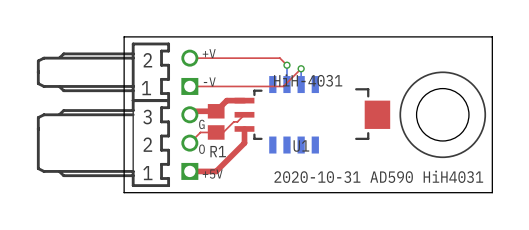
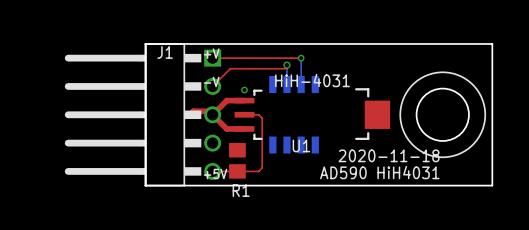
board edge: (492, 43) (492, 36) (124, 36) (124, 192) (492, 192) (492, 185) -> (492, 43) (145, 43) (145, 185) (492, 185)
top track: (189, 58) (212, 58) -> none
top track: (279, 58) (286, 65) -> (279, 58) (301, 58)
bottom track: none -> (301, 58) (301, 68)
via: none -> (301, 58)
top track: none -> (286, 68) (230, 68) (212, 86)
top track: (301, 68) (283, 86) (189, 86) -> none
via: (301, 68) -> none
part: (117, 72) -> none
via: none -> (244, 90)
J1: none -> (142, 114)
top track: none -> (212, 114) (226, 128) (244, 128)
top track: (244, 114) (223, 132) (200, 132) (189, 143) -> none
R1 position: (216, 121) -> (237, 160)
text: G (201, 124) -> none
top track: (244, 128) (244, 143) (216, 171) -> (244, 114) (258, 114) (262, 118) (262, 167) (258, 171) (216, 171)
part: (117, 143) -> none
text: O (201, 149) -> none
text: none -> 2020-11-18 (389, 155)
top track: (189, 171) (212, 171) -> none
text: 2020-10-31 AD590 HiH4031 (378, 176) -> AD590 HiH4031 (379, 172)

